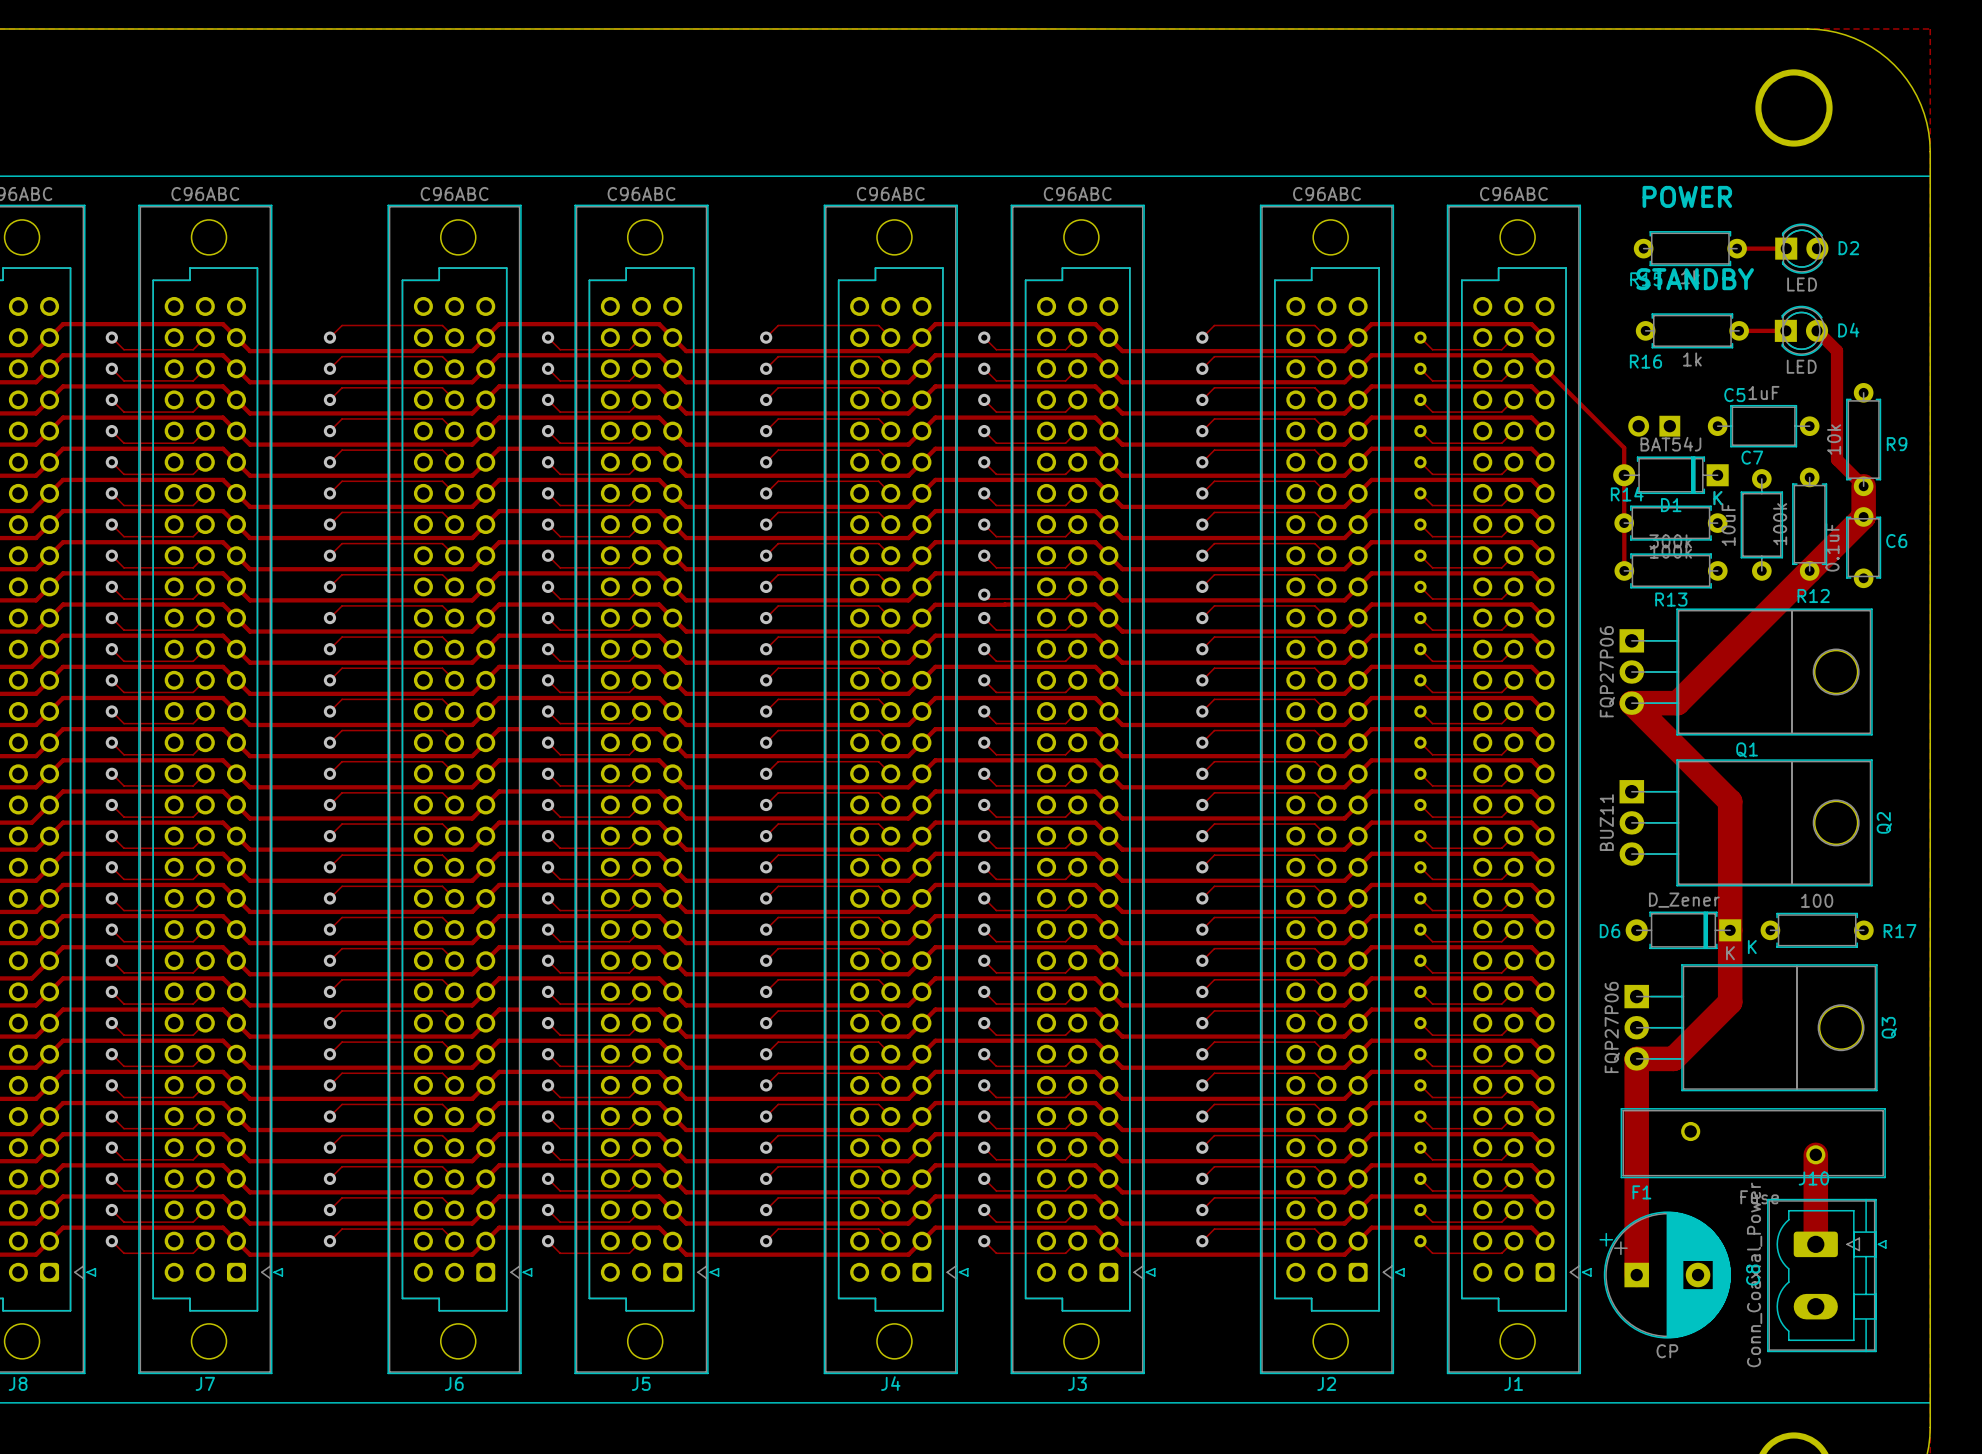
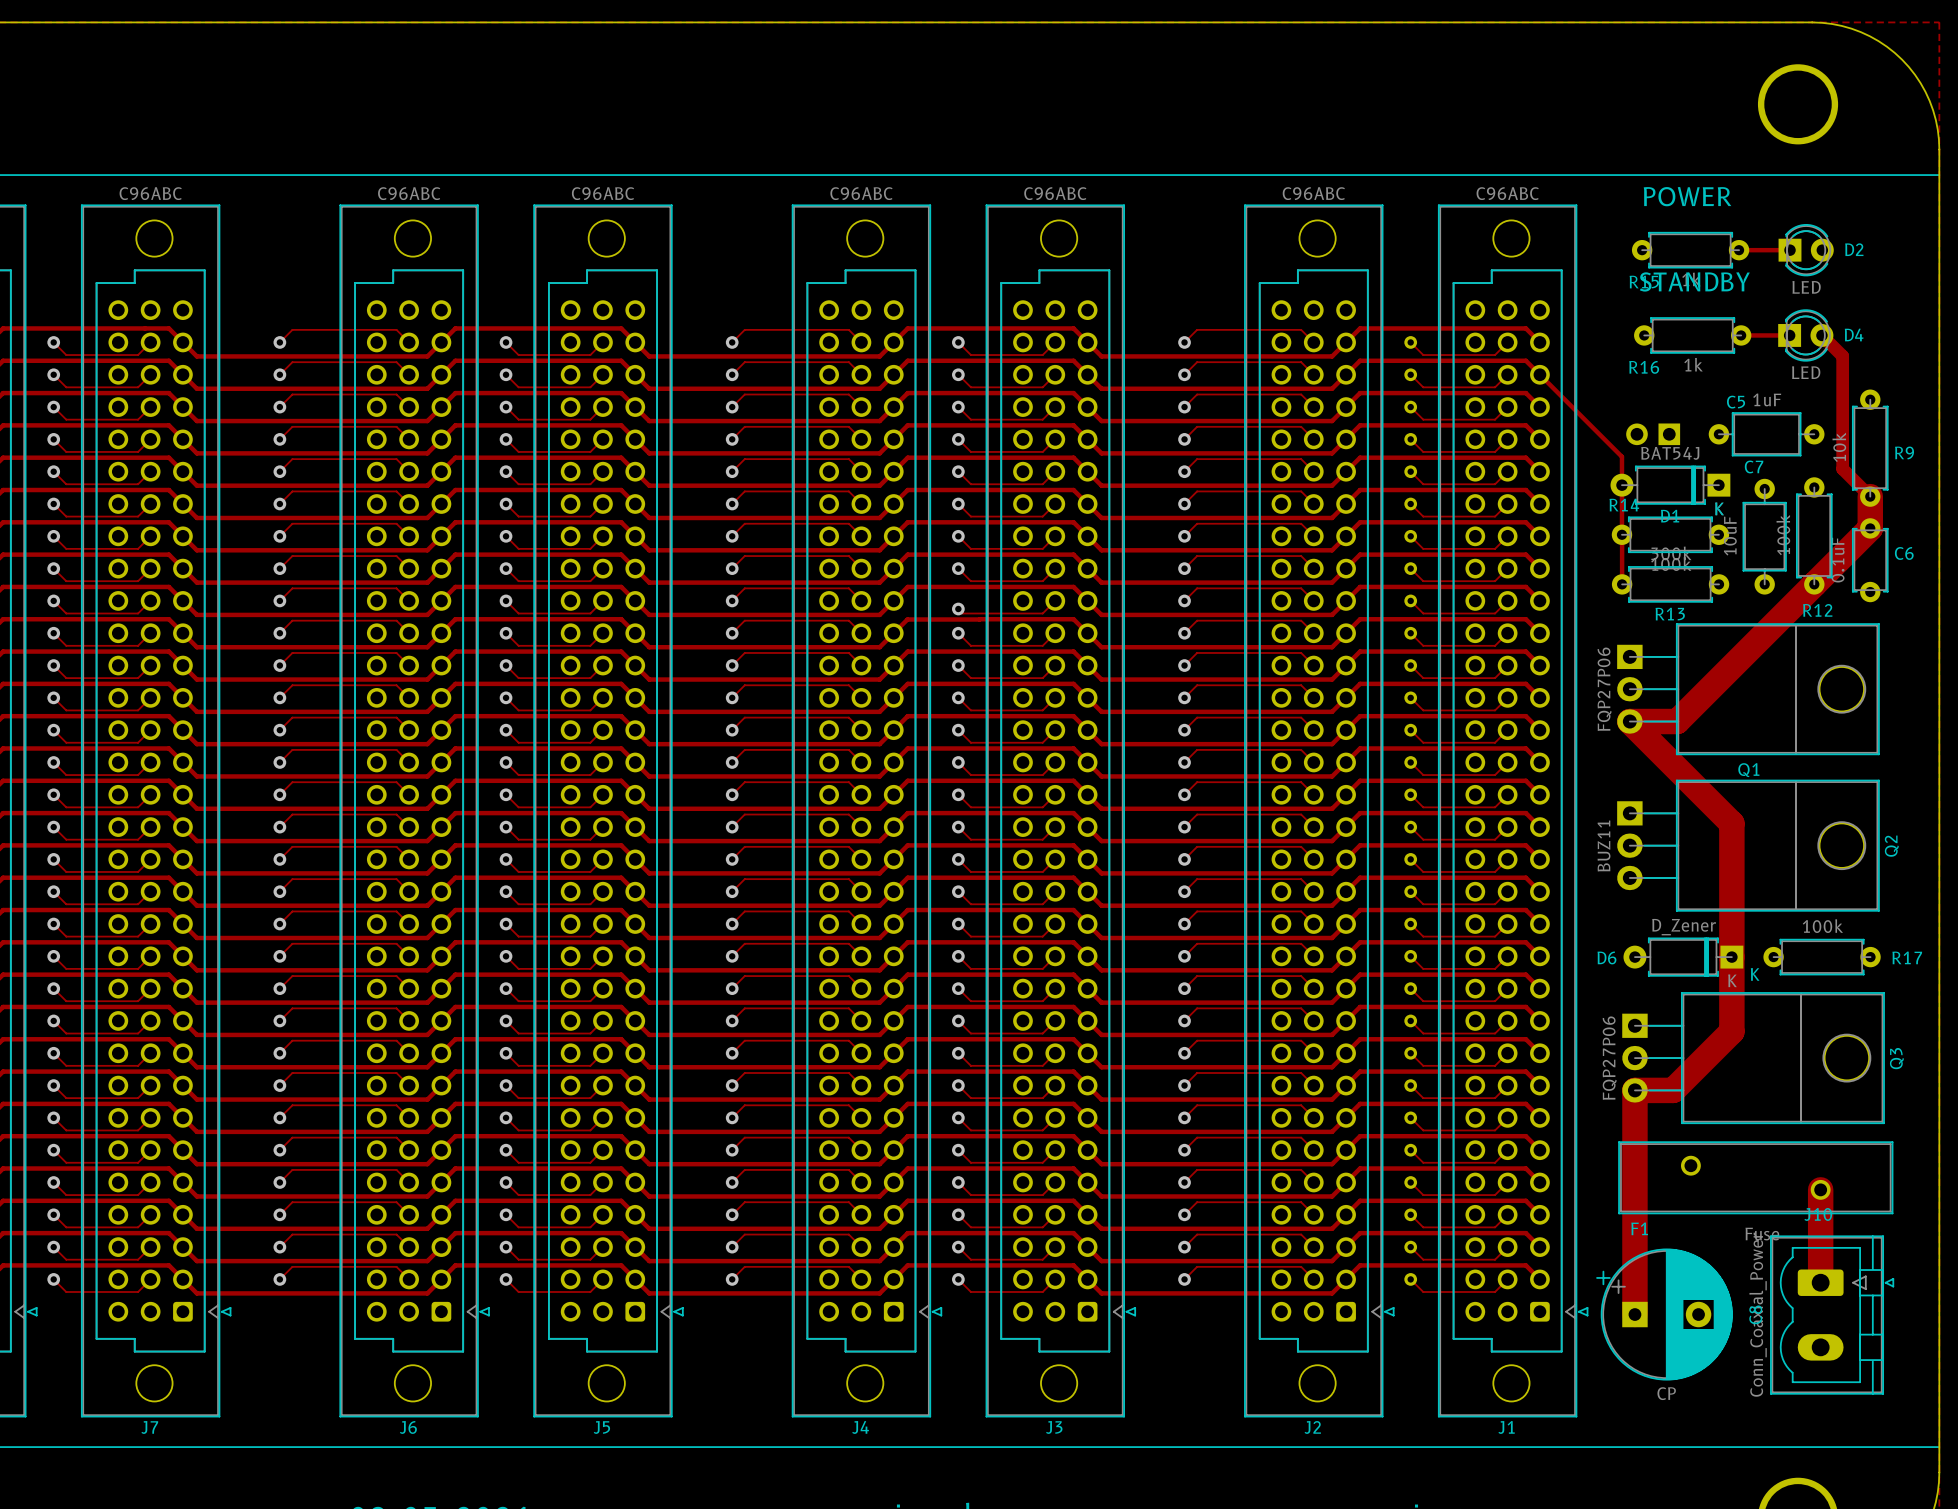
R17 value: 100 (1817, 900) -> 100k (1822, 926)

